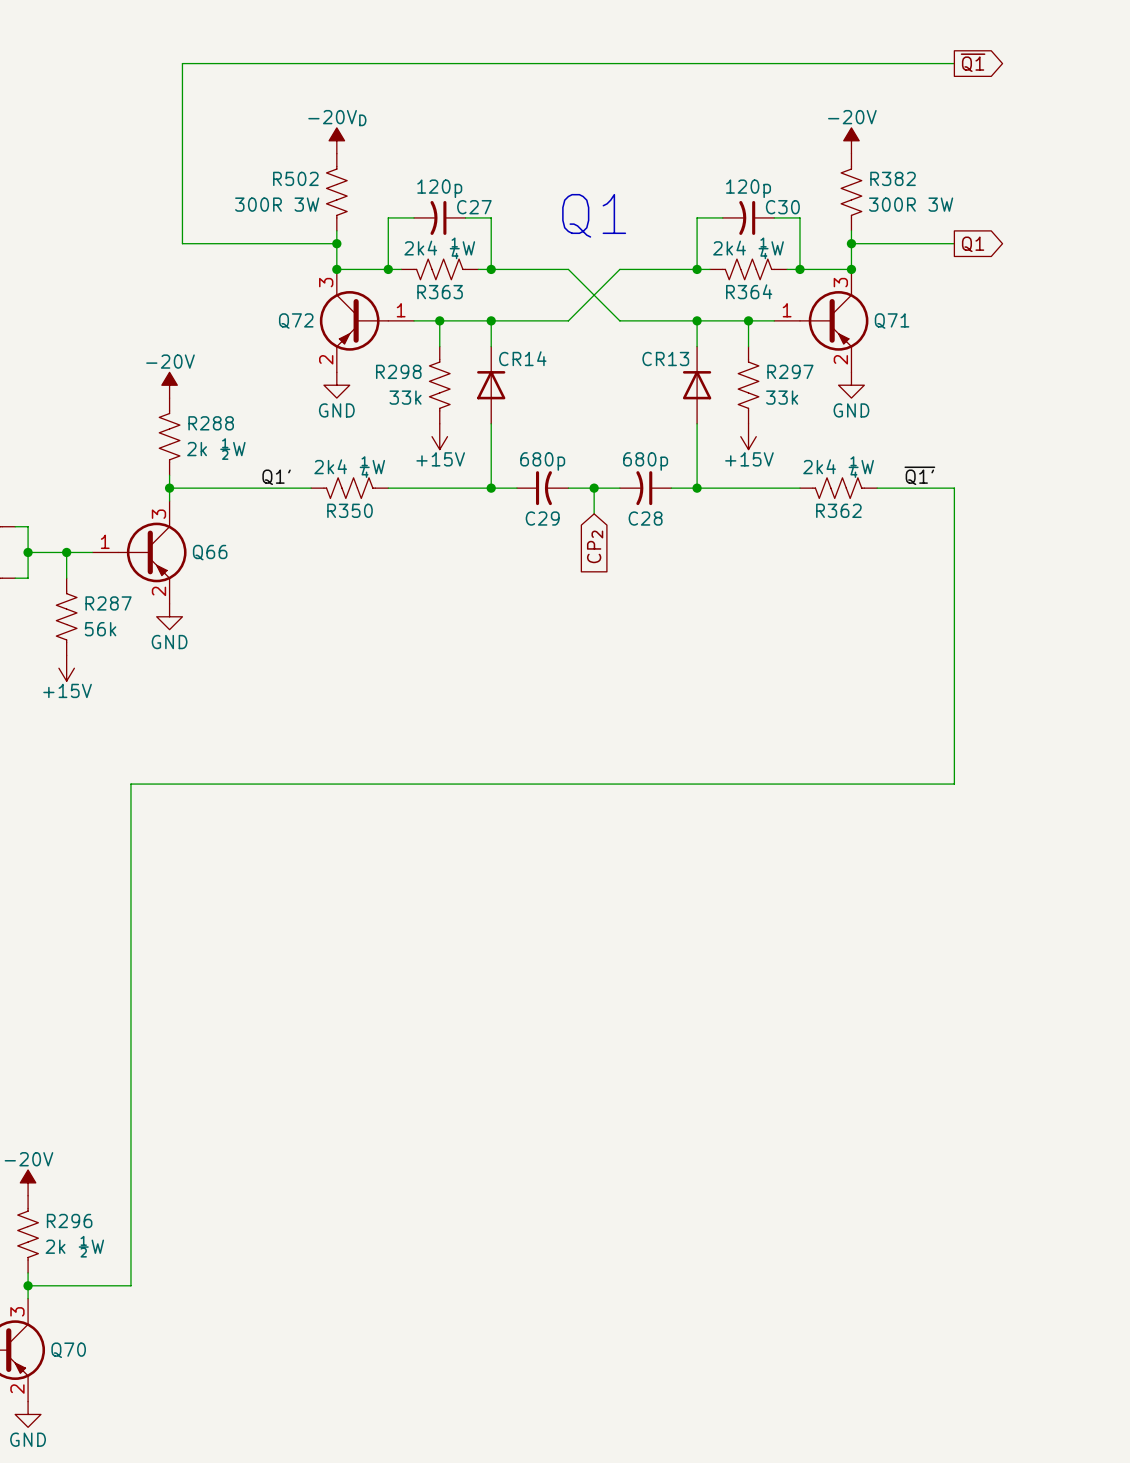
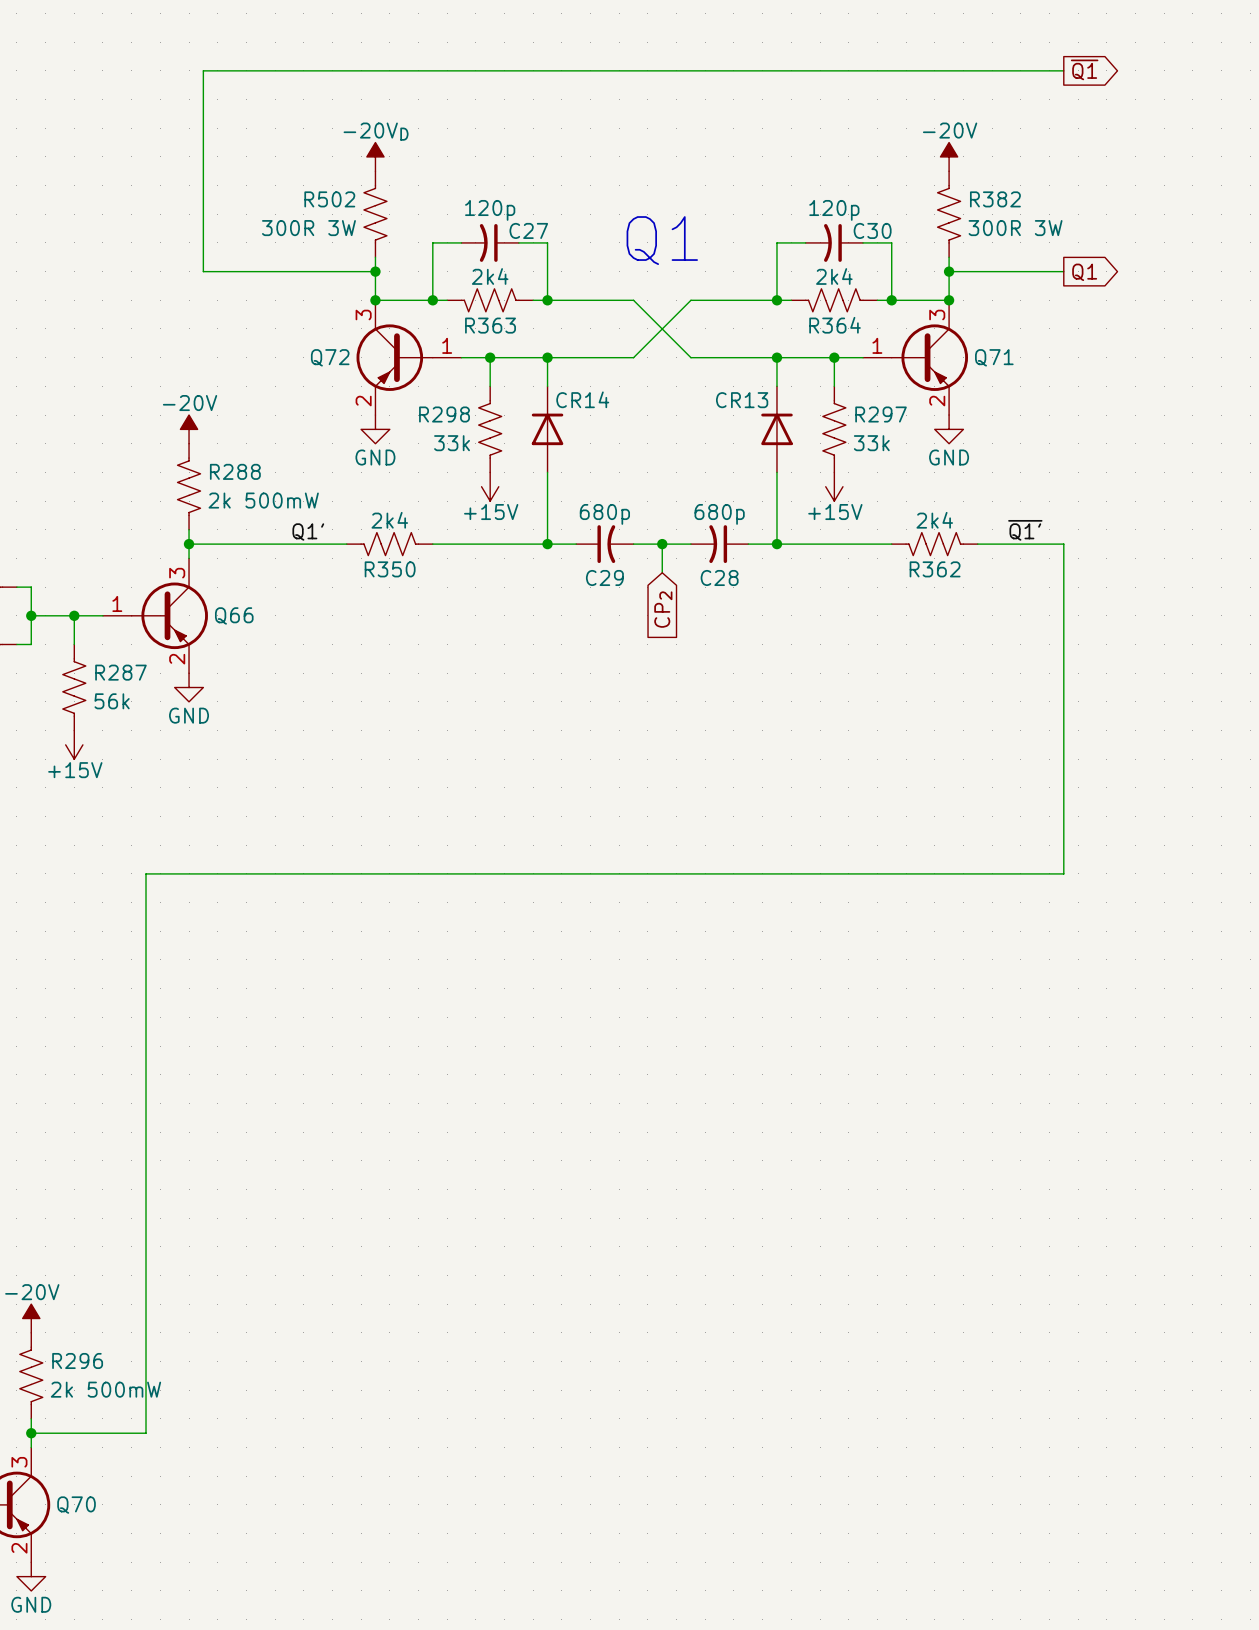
R363 value: 2k4 ¼W (439, 248) -> 2k4 (490, 276)
R364 value: 2k4 ¼W (748, 248) -> 2k4 (834, 276)
R288 value: 2k ½W (216, 449) -> 2k 500mW (263, 500)
R350 value: 2k4 ¼W (349, 467) -> 2k4 (389, 520)
R362 value: 2k4 ¼W (838, 467) -> 2k4 (934, 520)
R296 value: 2k ½W (74, 1246) -> 2k 500mW (105, 1389)

